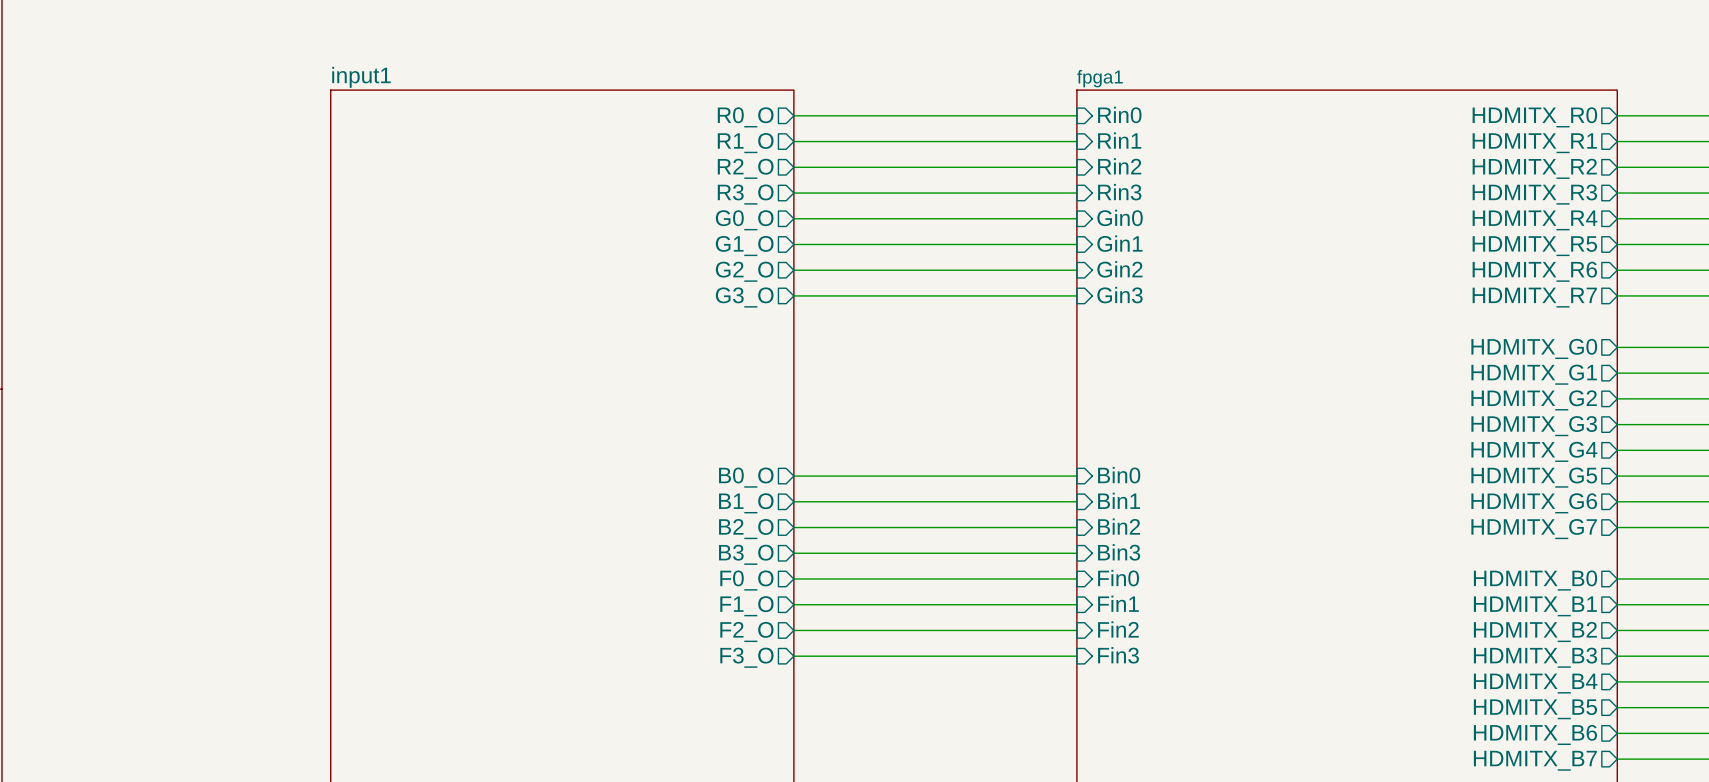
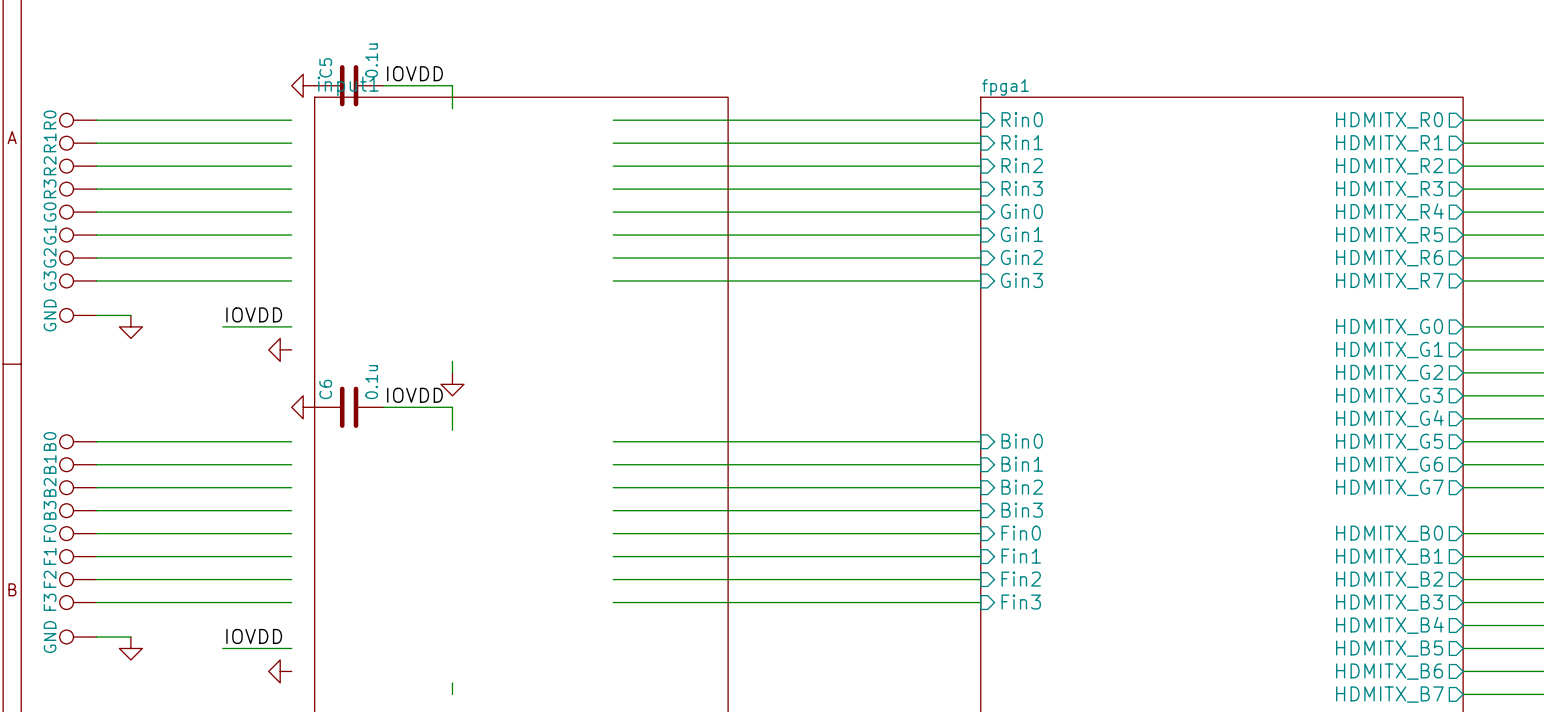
label: none -> IOVDD (414, 73)
power symbol: none -> (303, 85)
C5: none -> 0.1u (349, 85)
wire: none -> (383, 85) (452, 85) (452, 108)
part: none -> R0 (78, 120)
wire: none -> (96, 120) (291, 120)
wire: none -> (613, 120) (728, 120)
sheet pin: R0_O (745, 117) -> none
part: none -> R1 (78, 143)
wire: none -> (96, 143) (291, 143)
wire: none -> (613, 143) (728, 143)
sheet pin: R1_O (745, 143) -> none
part: none -> R2 (78, 166)
wire: none -> (96, 166) (291, 166)
wire: none -> (613, 166) (728, 166)
sheet pin: R2_O (745, 168) -> none
part: none -> R3 (78, 189)
wire: none -> (96, 189) (291, 189)
wire: none -> (613, 189) (728, 189)
sheet pin: R3_O (745, 194) -> none
part: none -> G0 (78, 212)
wire: none -> (96, 212) (291, 212)
wire: none -> (613, 212) (728, 212)
sheet pin: G0_O (744, 220) -> none
part: none -> G1 (78, 235)
wire: none -> (96, 235) (291, 235)
wire: none -> (613, 235) (728, 235)
sheet pin: G1_O (744, 246) -> none
part: none -> G2 (78, 258)
wire: none -> (96, 258) (291, 258)
wire: none -> (613, 258) (728, 258)
sheet pin: G2_O (744, 271) -> none
part: none -> G3 (78, 280)
wire: none -> (96, 280) (291, 280)
wire: none -> (613, 280) (728, 280)
sheet pin: G3_O (744, 297) -> none
label: none -> IOVDD (254, 314)
part: none -> GND (78, 315)
wire: none -> (96, 315) (130, 315)
power symbol: none -> (130, 326)
wire: none -> (222, 326) (291, 326)
power symbol: none -> (280, 349)
wire: none -> (452, 361) (452, 372)
power symbol: none -> (452, 384)
label: none -> IOVDD (414, 395)
power symbol: none -> (303, 407)
C6: none -> 0.1u (349, 407)
wire: none -> (383, 407) (452, 407) (452, 430)
part: none -> B0 (78, 441)
wire: none -> (96, 441) (291, 441)
wire: none -> (613, 441) (728, 441)
sheet pin: B0_O (746, 477) -> none
part: none -> B1 (78, 464)
wire: none -> (96, 464) (291, 464)
wire: none -> (613, 464) (728, 464)
sheet pin: B1_O (746, 503) -> none
part: none -> B2 (78, 487)
wire: none -> (96, 487) (291, 487)
wire: none -> (613, 487) (728, 487)
sheet pin: B2_O (746, 529) -> none
part: none -> B3 (78, 510)
wire: none -> (96, 510) (291, 510)
wire: none -> (613, 510) (728, 510)
sheet pin: B3_O (746, 554) -> none
part: none -> F0 (78, 533)
wire: none -> (96, 533) (291, 533)
wire: none -> (613, 533) (728, 533)
sheet pin: F0_O (746, 580) -> none
part: none -> F1 (78, 556)
wire: none -> (96, 556) (291, 556)
wire: none -> (613, 556) (728, 556)
sheet pin: F1_O (746, 606) -> none
part: none -> F2 (78, 579)
wire: none -> (96, 579) (291, 579)
wire: none -> (613, 579) (728, 579)
sheet pin: F2_O (746, 631) -> none
part: none -> F3 (78, 602)
wire: none -> (96, 602) (291, 602)
wire: none -> (613, 602) (728, 602)
sheet pin: F3_O (746, 657) -> none
part: none -> GND (78, 637)
wire: none -> (96, 637) (130, 637)
label: none -> IOVDD (254, 636)
power symbol: none -> (130, 648)
wire: none -> (222, 648) (291, 648)
power symbol: none -> (280, 671)
wire: none -> (452, 682) (452, 694)

